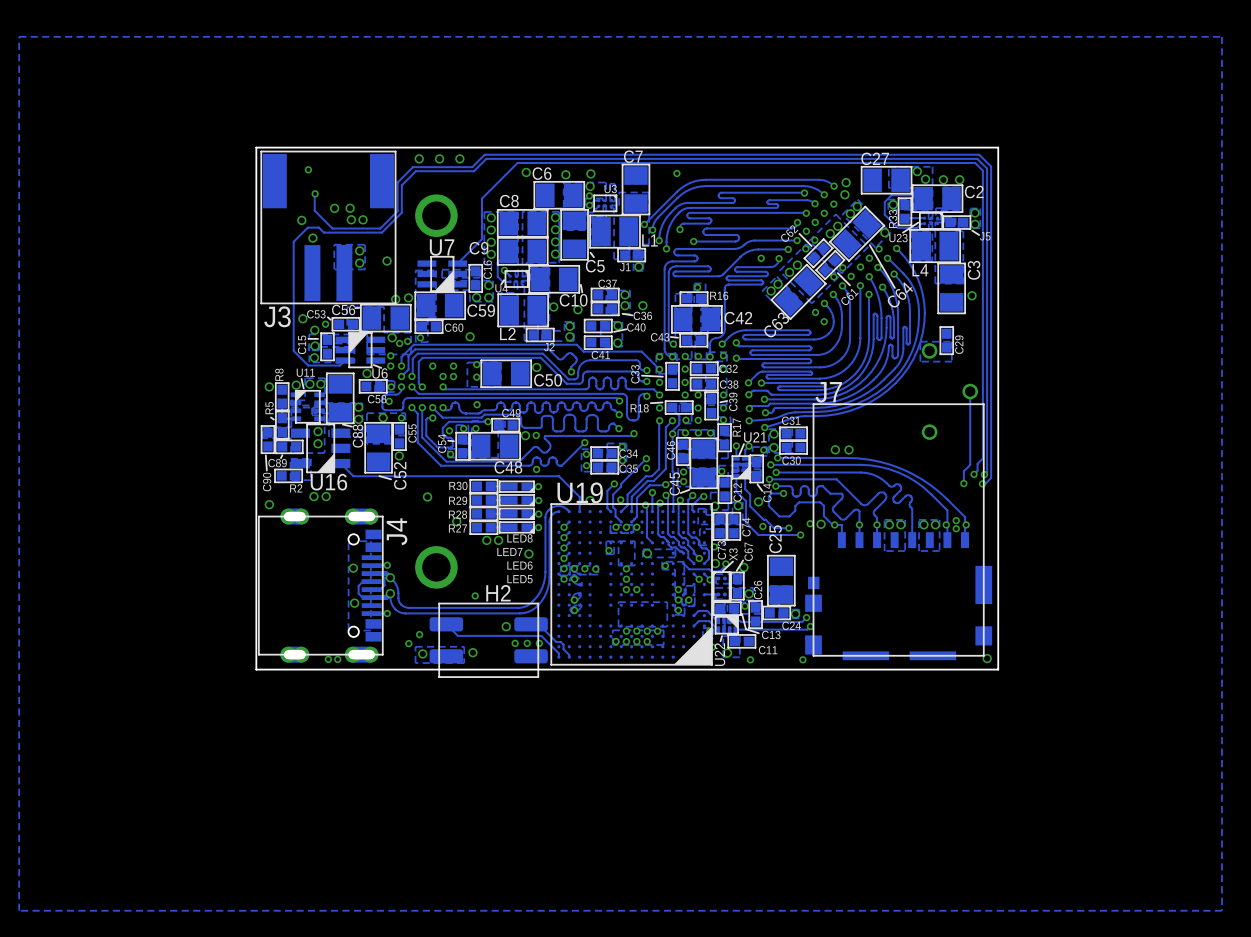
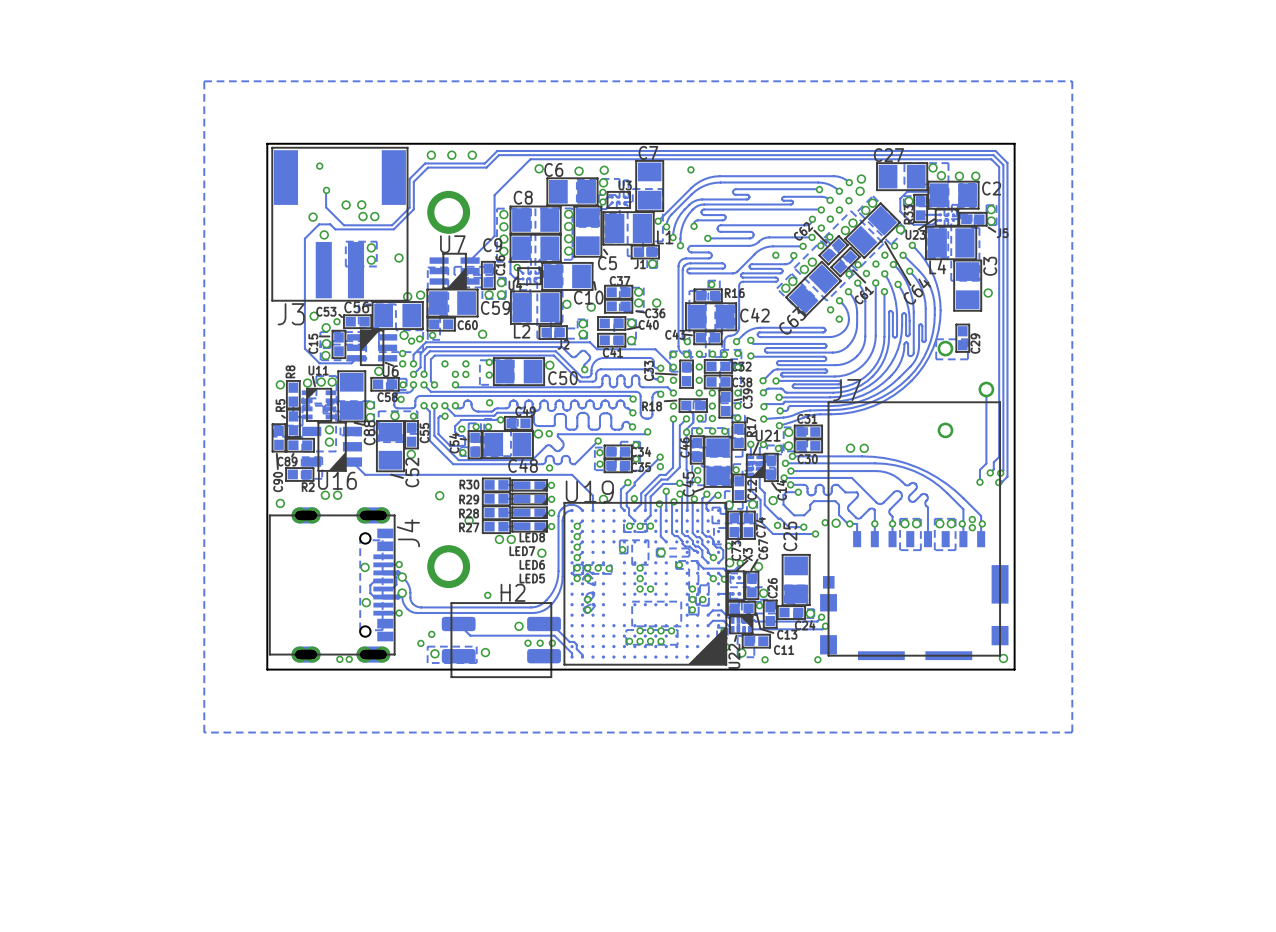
zone outline: (1222, 36) (1222, 910) (19, 910) (19, 36) (1222, 36) -> (1072, 81) (1072, 732) (204, 732) (204, 81) (1072, 81)

